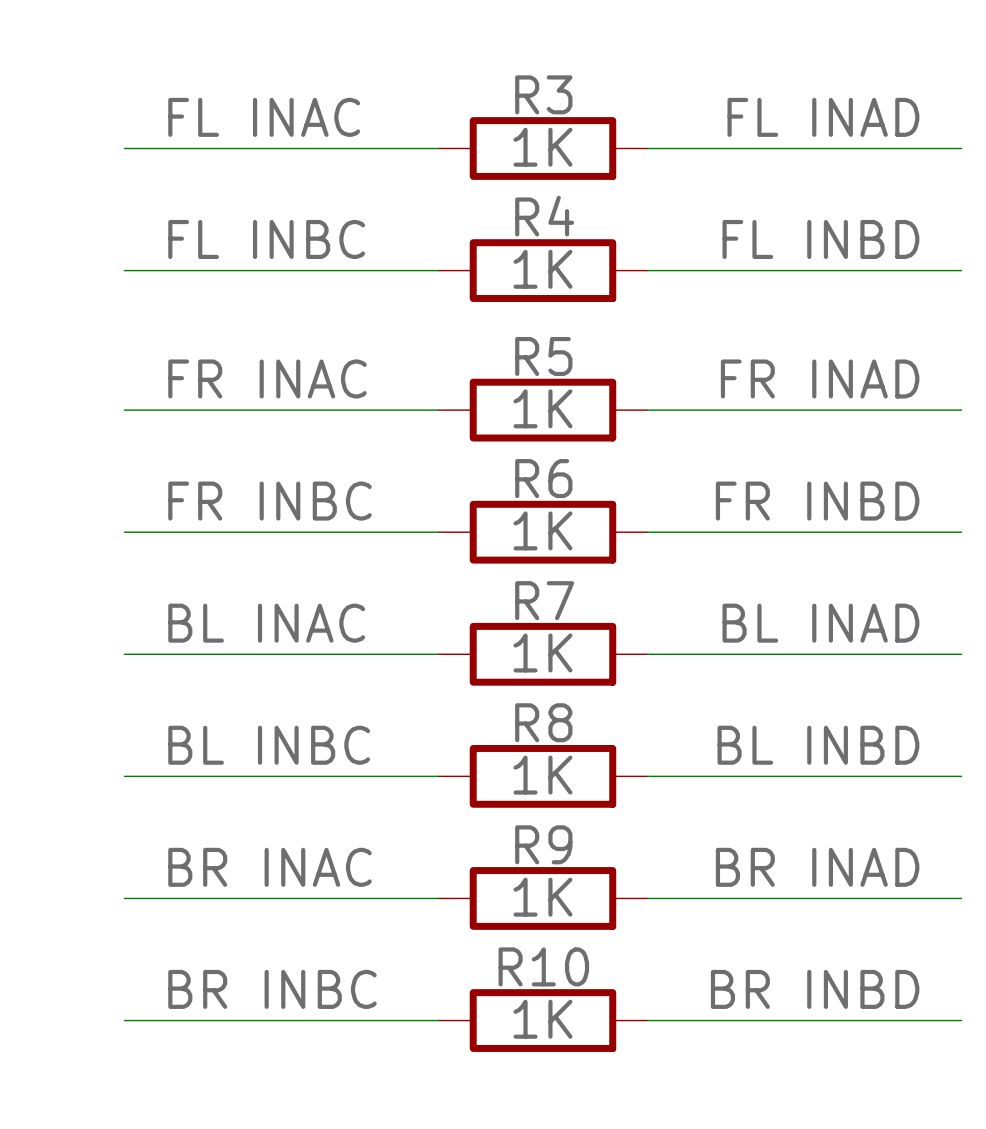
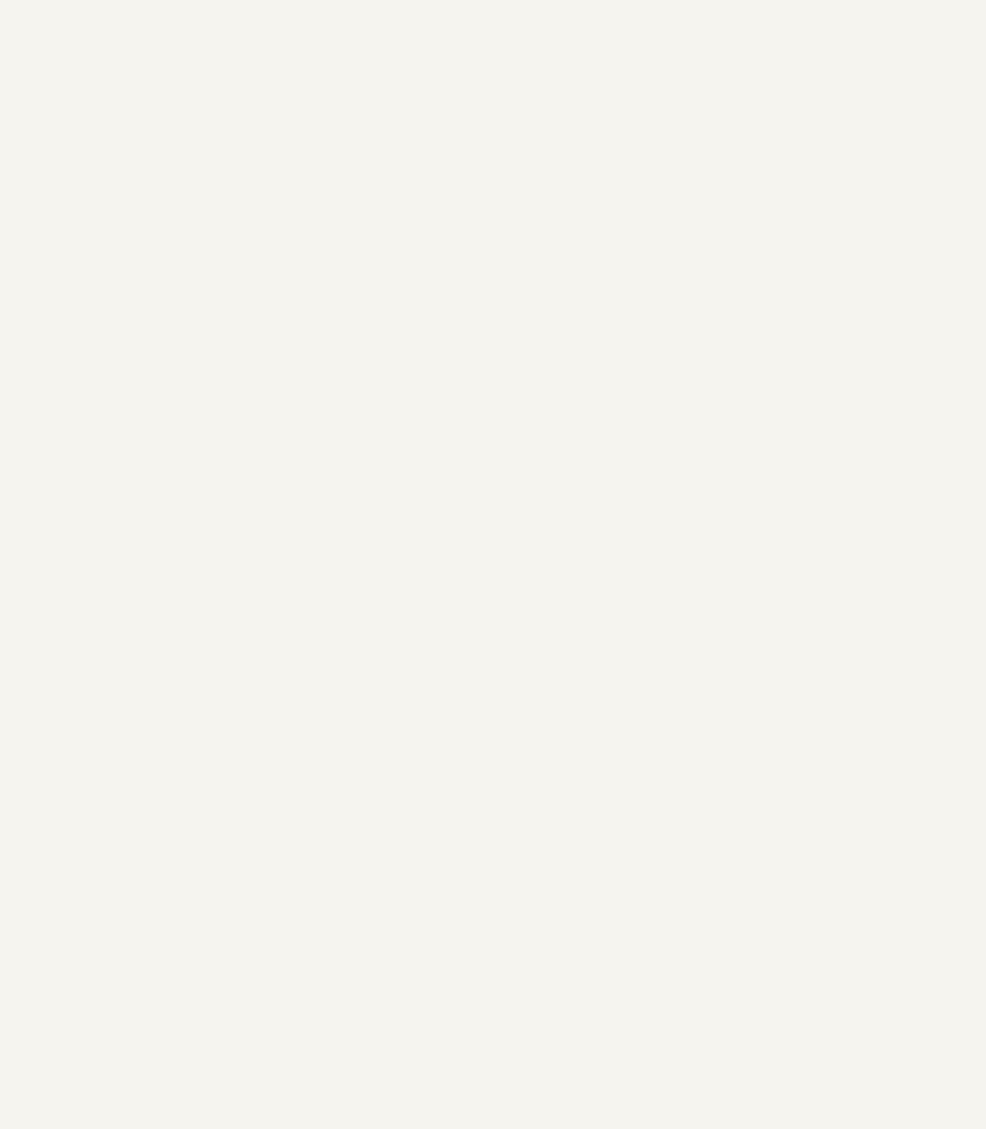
label: FL INAC (264, 117) -> none
label: FL INAD (823, 117) -> none
wire: (124, 148) (438, 148) -> none
R3: 1K (542, 148) -> none
wire: (647, 148) (961, 148) -> none
label: FL INBC (266, 239) -> none
label: FL INBD (820, 239) -> none
wire: (124, 270) (438, 270) -> none
R4: 1K (542, 270) -> none
wire: (647, 270) (961, 270) -> none
label: FR INAC (267, 378) -> none
label: FR INAD (820, 378) -> none
wire: (124, 410) (438, 410) -> none
R5: 1K (542, 410) -> none
wire: (647, 410) (961, 410) -> none
label: FR INBC (270, 501) -> none
label: FR INBD (817, 501) -> none
wire: (124, 532) (438, 532) -> none
R6: 1K (542, 532) -> none
wire: (647, 532) (961, 532) -> none
label: BL INAC (266, 623) -> none
label: BL INAD (820, 623) -> none
wire: (124, 654) (438, 654) -> none
R7: 1K (542, 654) -> none
wire: (647, 654) (961, 654) -> none
label: BL INBC (269, 745) -> none
label: BL INBD (818, 745) -> none
wire: (124, 776) (438, 776) -> none
R8: 1K (542, 776) -> none
wire: (647, 776) (961, 776) -> none
label: BR INAC (270, 867) -> none
label: BR INAD (817, 867) -> none
wire: (124, 898) (438, 898) -> none
R9: 1K (542, 898) -> none
wire: (647, 898) (961, 898) -> none
label: BR INBC (272, 989) -> none
label: BR INBD (815, 989) -> none
wire: (124, 1020) (438, 1020) -> none
R10: 1K (542, 1020) -> none
wire: (647, 1020) (961, 1020) -> none

